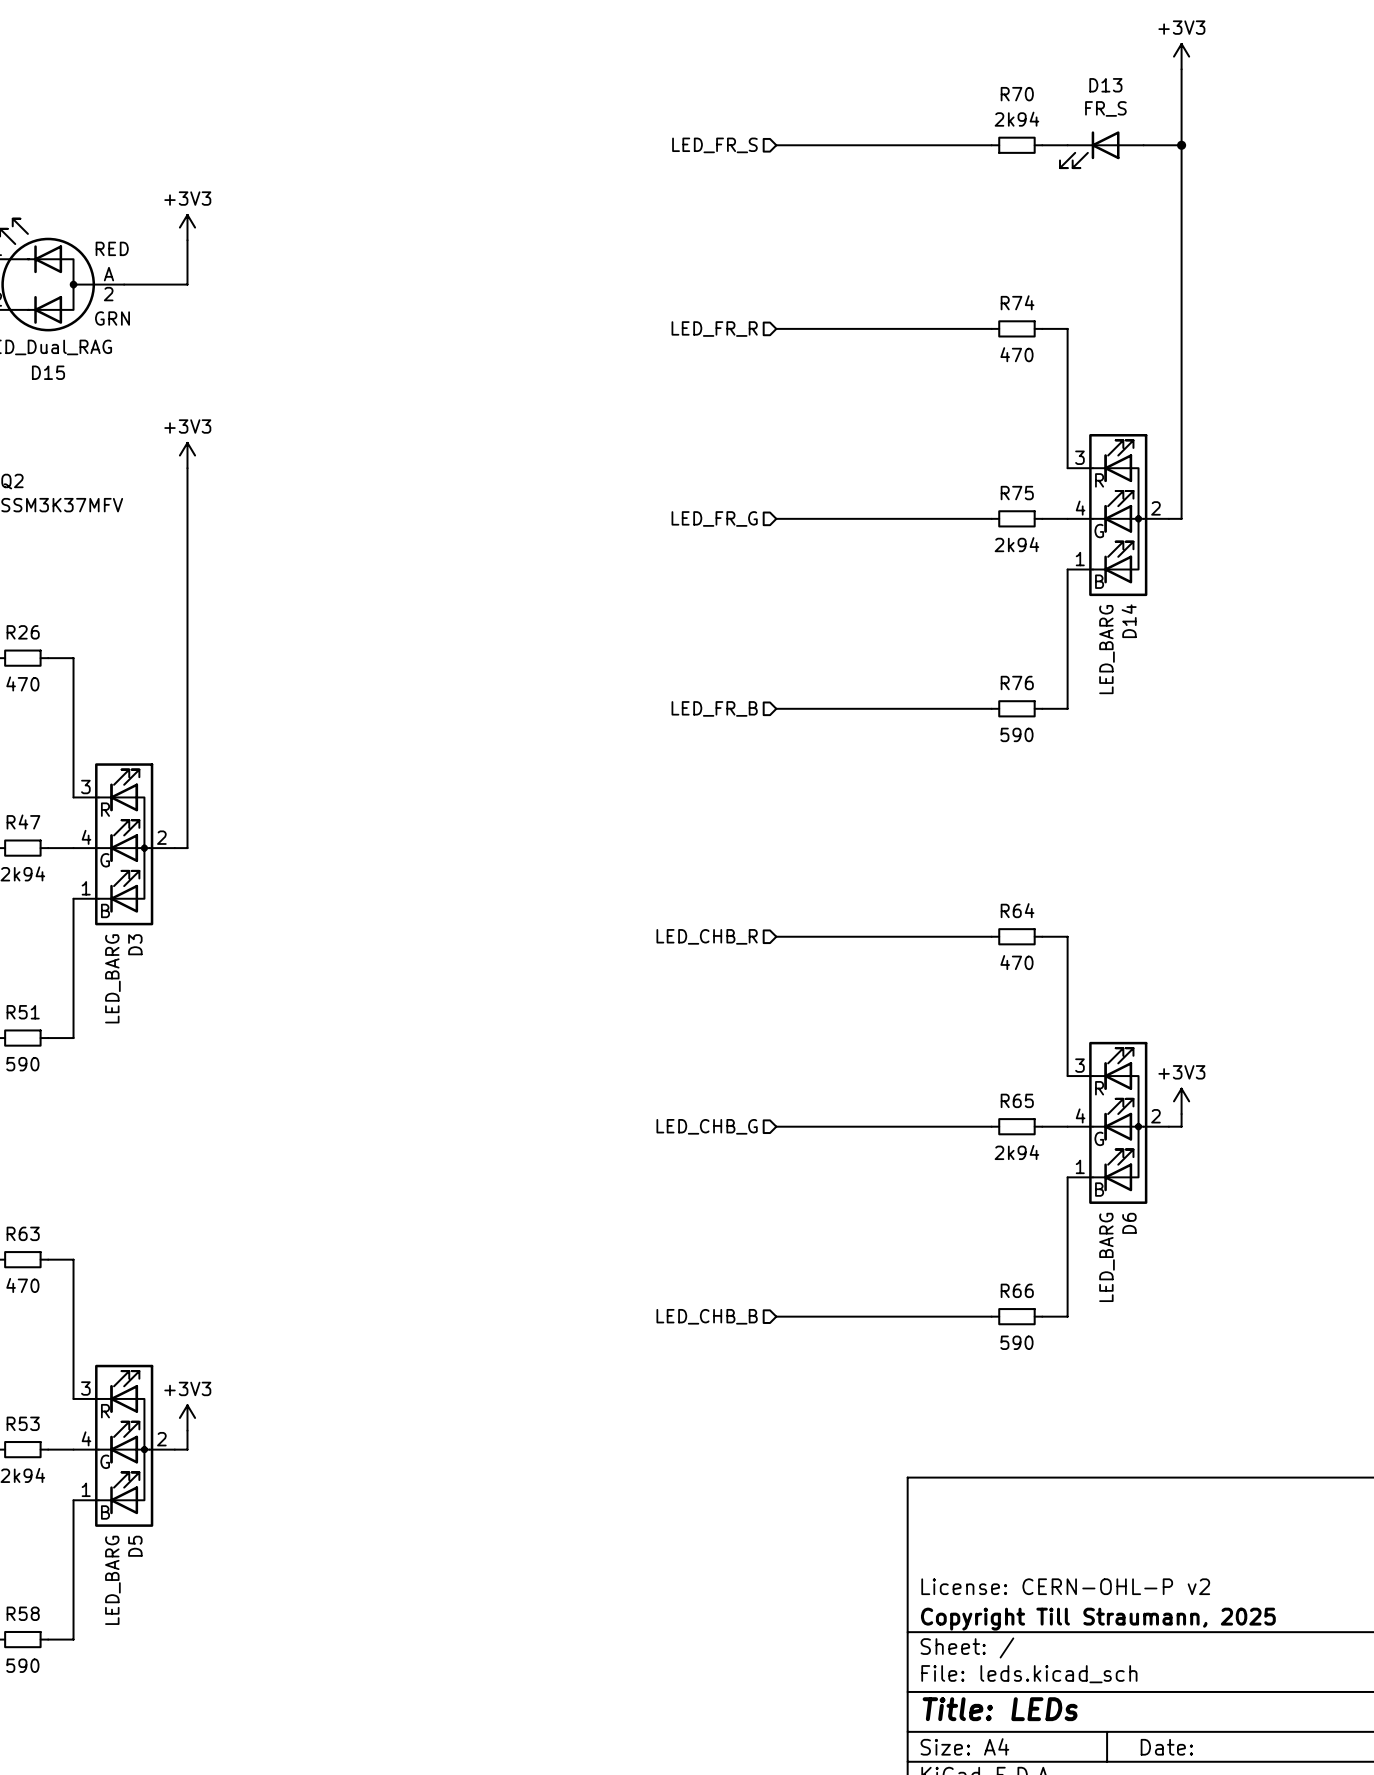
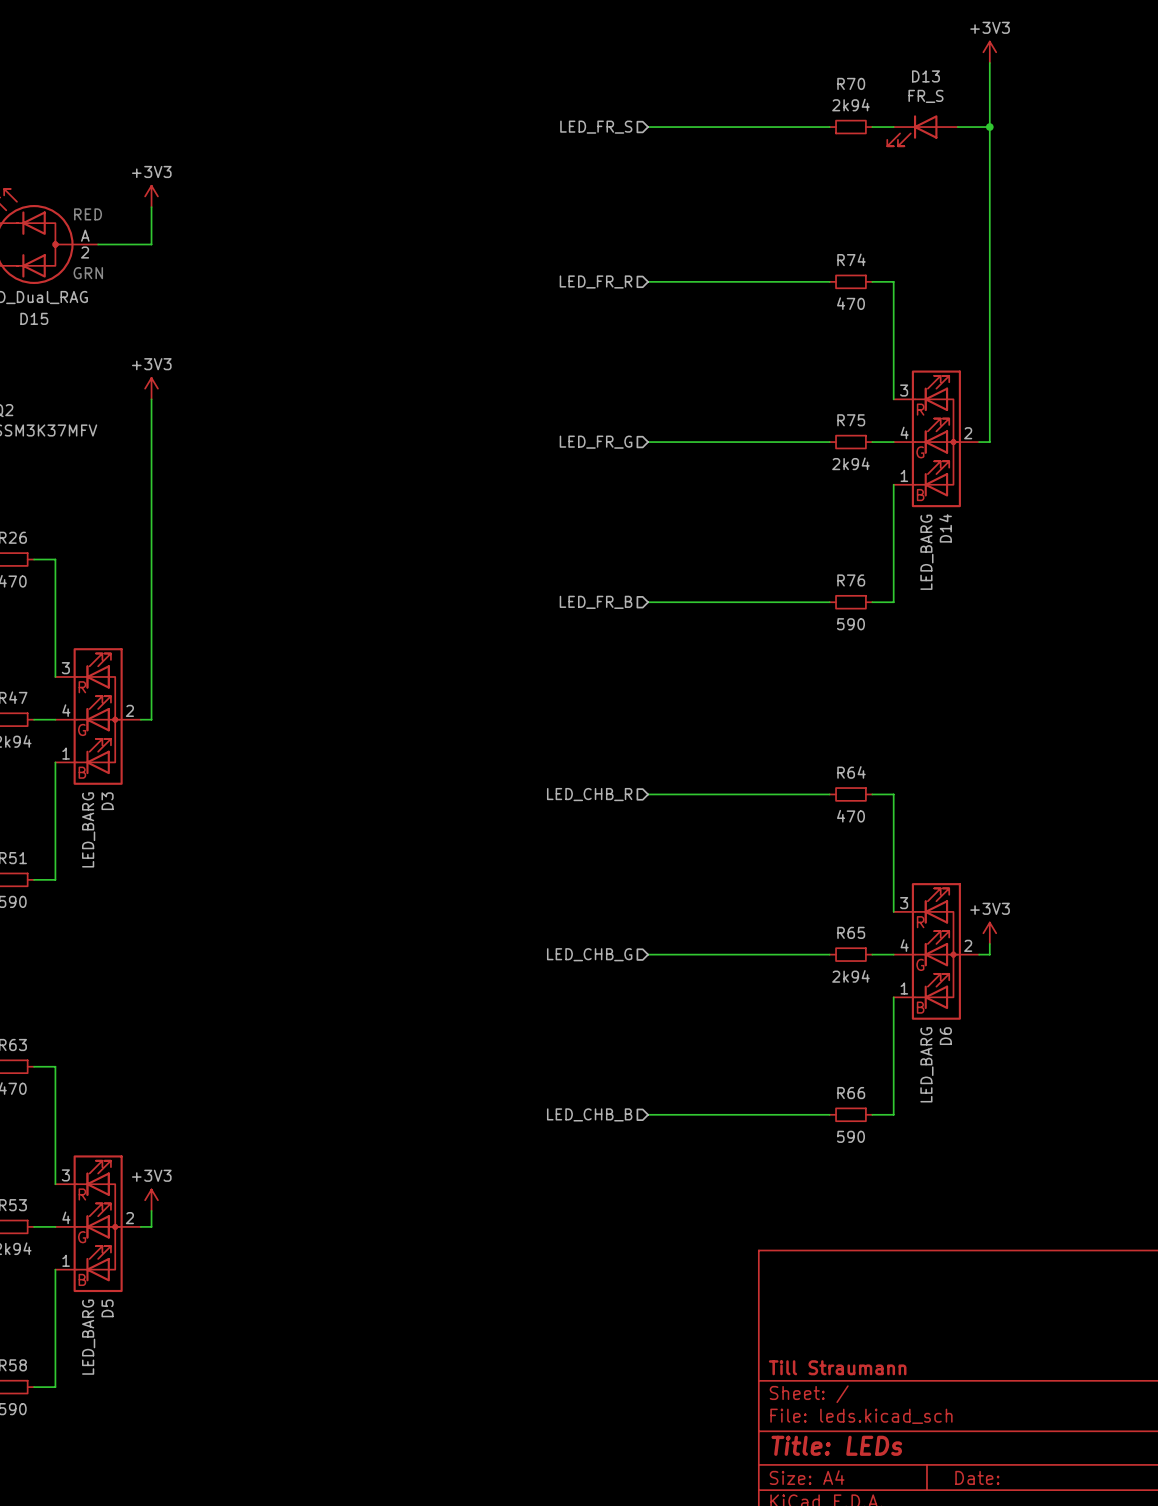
title block: License: CERN-OHL-P v2 (1065, 1586) -> none
title block: Copyright Till Straumann, 2025 (1098, 1619) -> Till Straumann (837, 1367)

